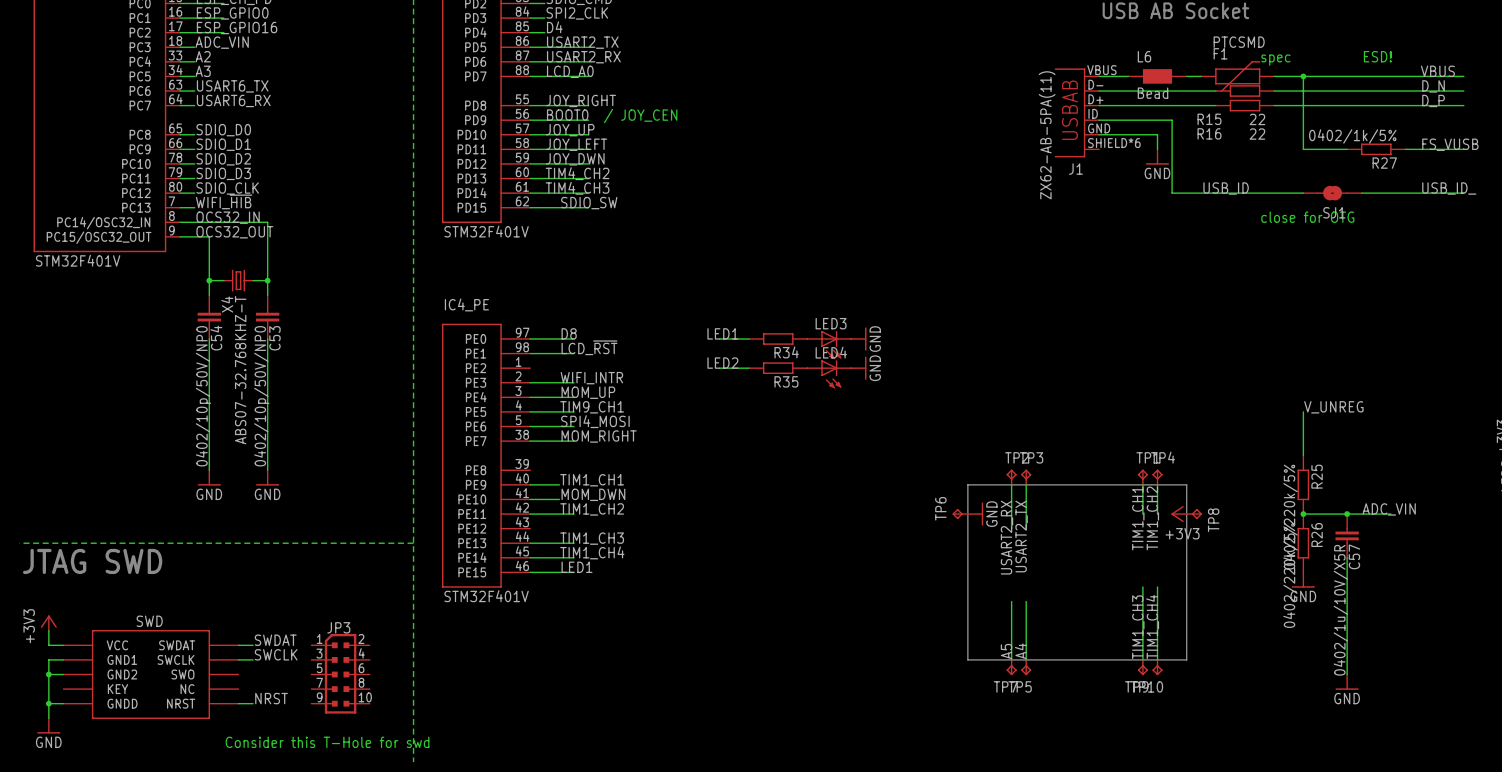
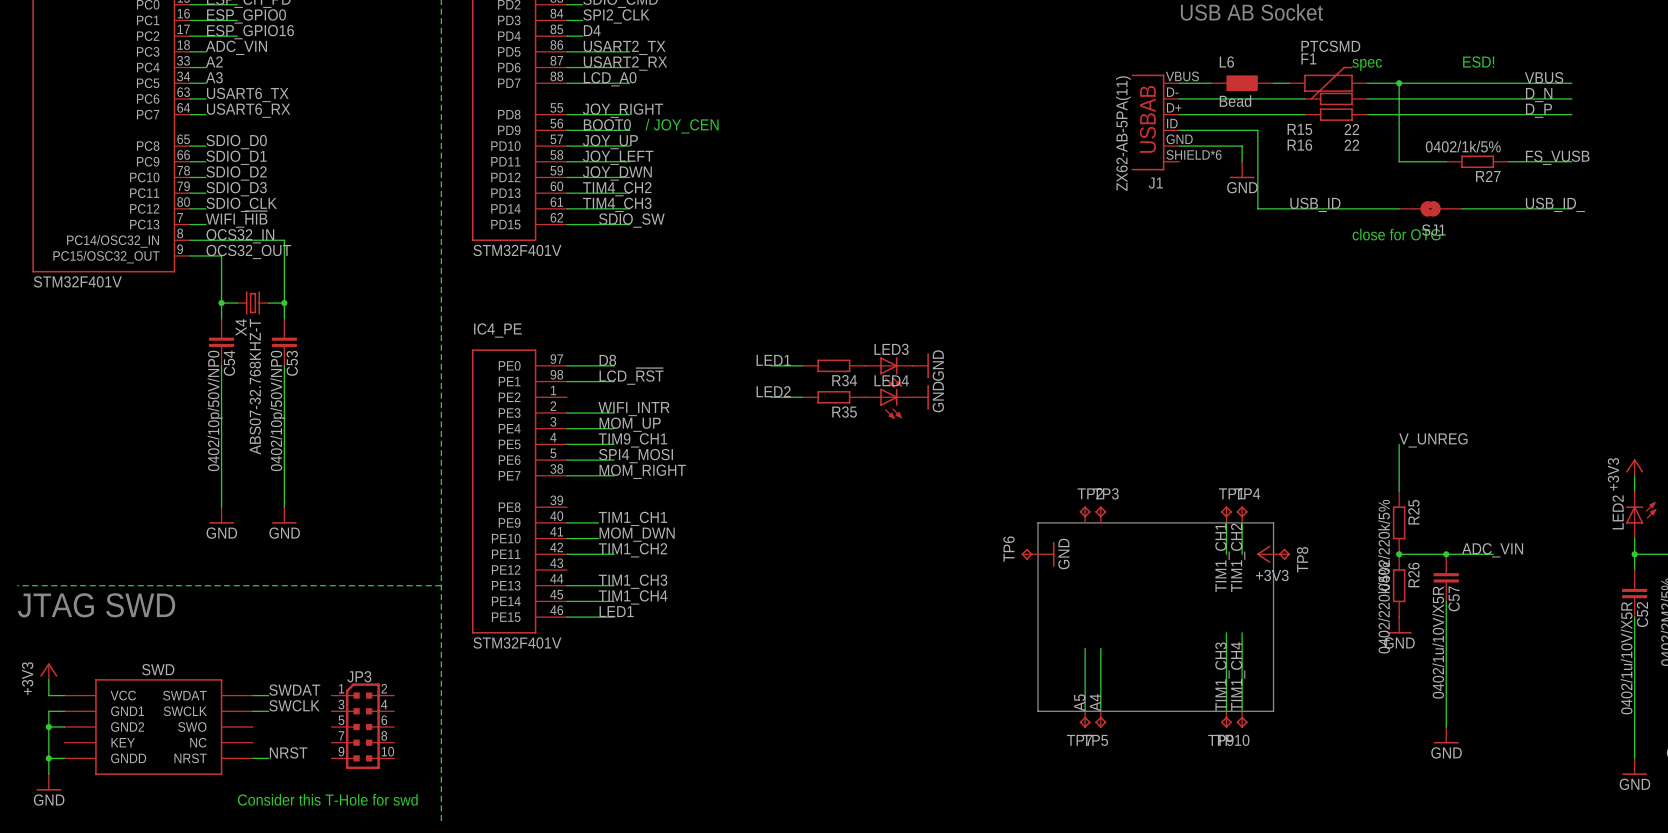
wire: (1011, 484) (1011, 528) -> none
wire: (1026, 484) (1026, 528) -> none
label: USART2_TX (1021, 536) -> none
label: USART2_RX (1007, 537) -> none

